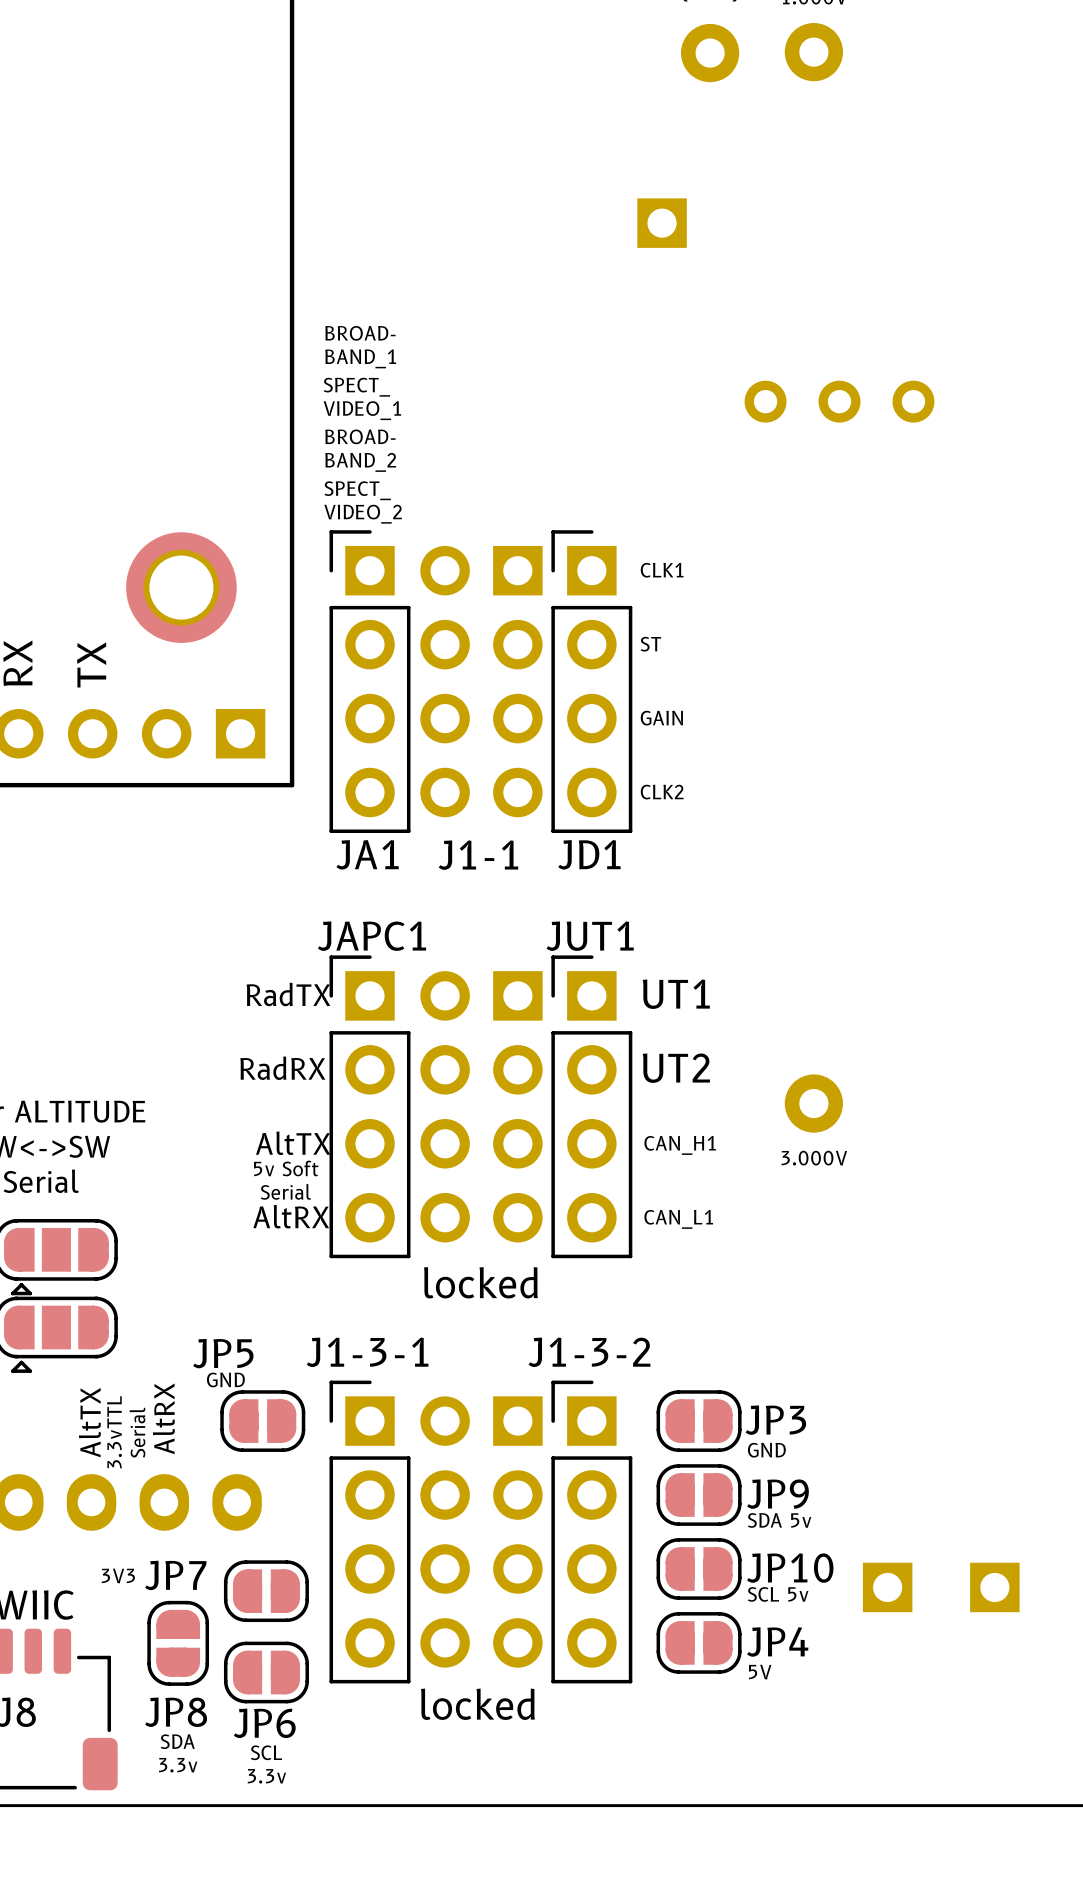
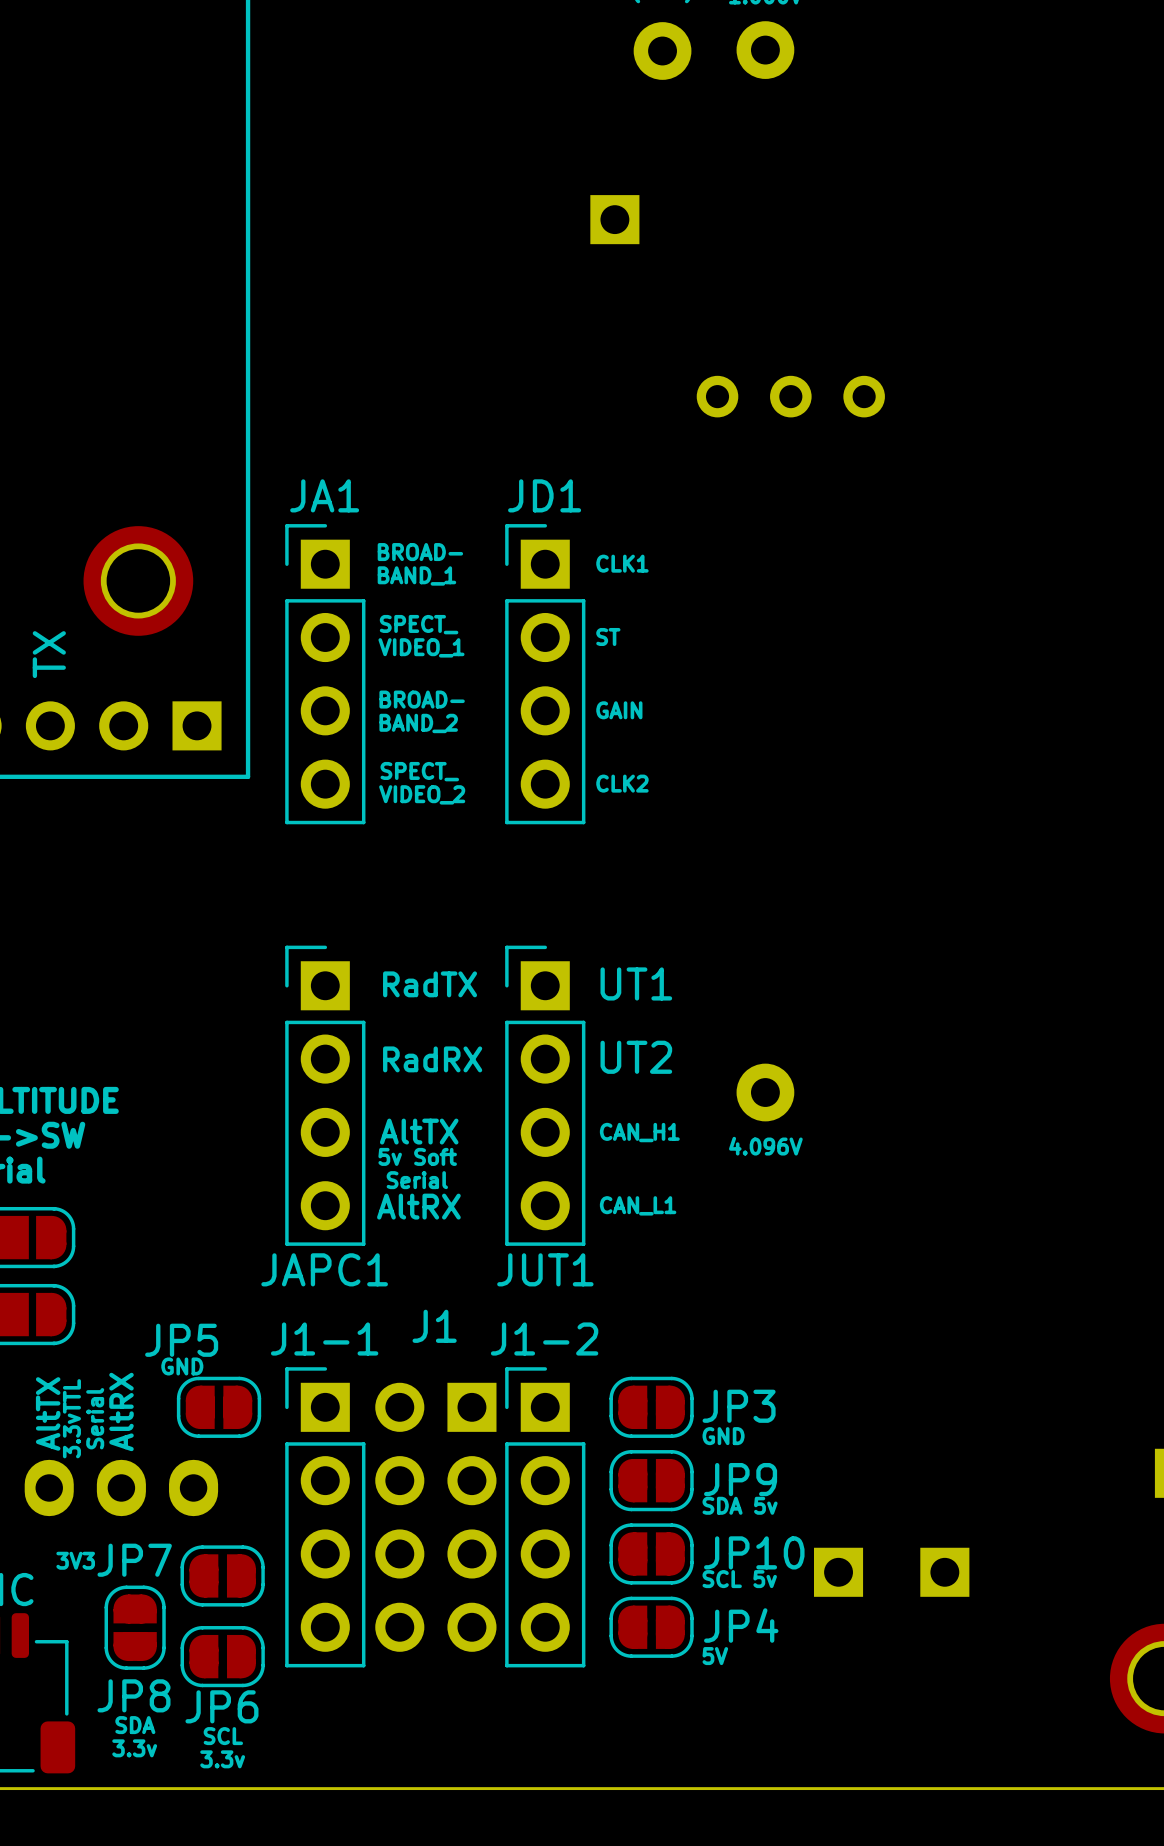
text: BROAD- (360, 333) -> none
text position: BAND_1 (360, 358) -> BAND_1 (416, 575)
text: SPECT_ (356, 387) -> none
text position: VIDEO_1 (362, 410) -> VIDEO_1 (421, 647)
text: BROAD- (360, 436) -> none
text position: BAND_2 (360, 462) -> BAND_2 (418, 723)
text: SPECT_ (357, 490) -> none
text position: VIDEO_2 (363, 514) -> VIDEO_2 (422, 794)
text: none -> BROAD- (420, 552)
text: none -> SPECT_ (419, 624)
J1-1: (481, 681) -> none
text: none -> BROAD- (422, 699)
text: none -> SPECT_ (419, 771)
JA1 name position: JA1 (367, 854) -> JA1 (324, 495)
JD1 name position: JD1 (589, 854) -> JD1 (544, 495)
JAPC1 name position: JAPC1 (372, 936) -> JAPC1 (324, 1269)
JUT1 name position: JUT1 (590, 936) -> JUT1 (545, 1269)
text position: RadTX (288, 994) -> RadTX (430, 984)
text position: RadRX (282, 1068) -> RadRX (432, 1059)
locked: (481, 1106) -> none
text position: AltTX (293, 1143) -> AltTX (419, 1131)
text: 3.000V (814, 1158) -> 4.096V (765, 1146)
text position: 5v Soft (286, 1168) -> 5v Soft (417, 1156)
text position: Serial (285, 1191) -> Serial (417, 1180)
text position: AltRX (291, 1216) -> AltRX (418, 1206)
J1-3-1 name: J1-3-1 (367, 1352) -> J1-1 (324, 1339)
J1-3-2 name: J1-3-2 (589, 1352) -> J1-2 (544, 1339)
locked name: locked (477, 1704) -> J1 (434, 1326)

